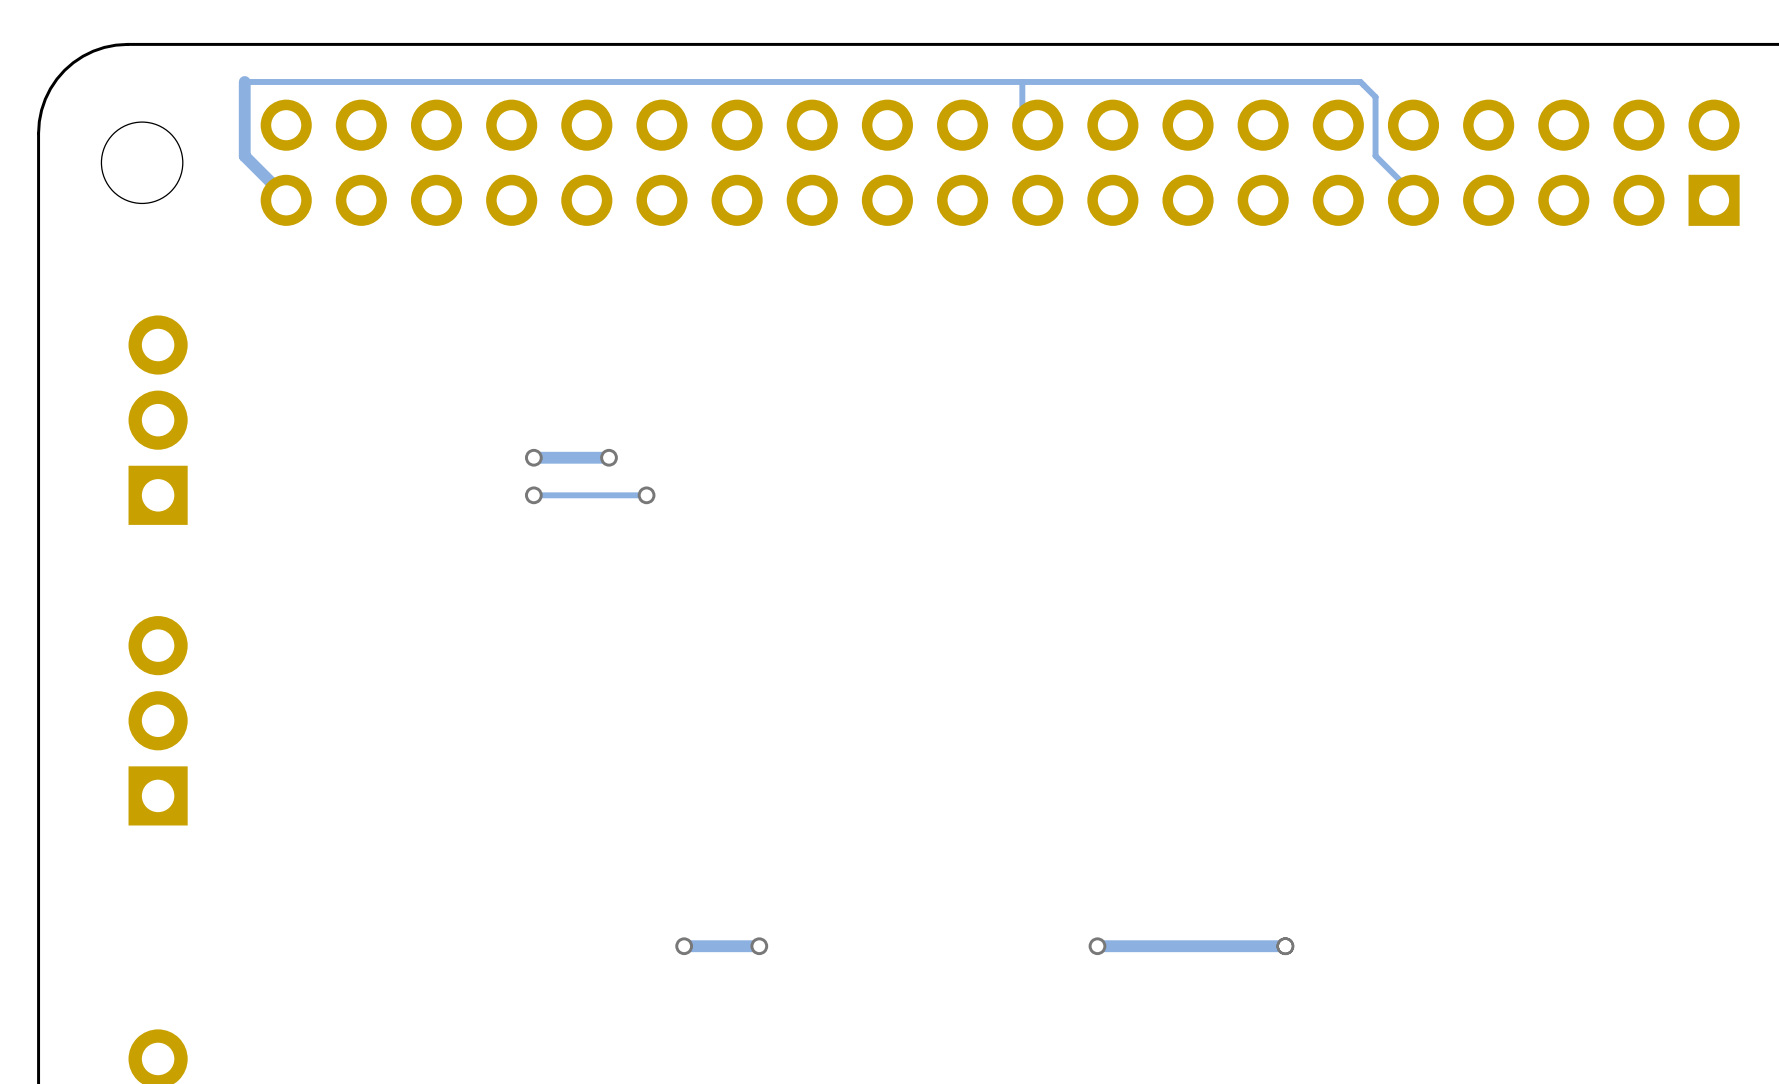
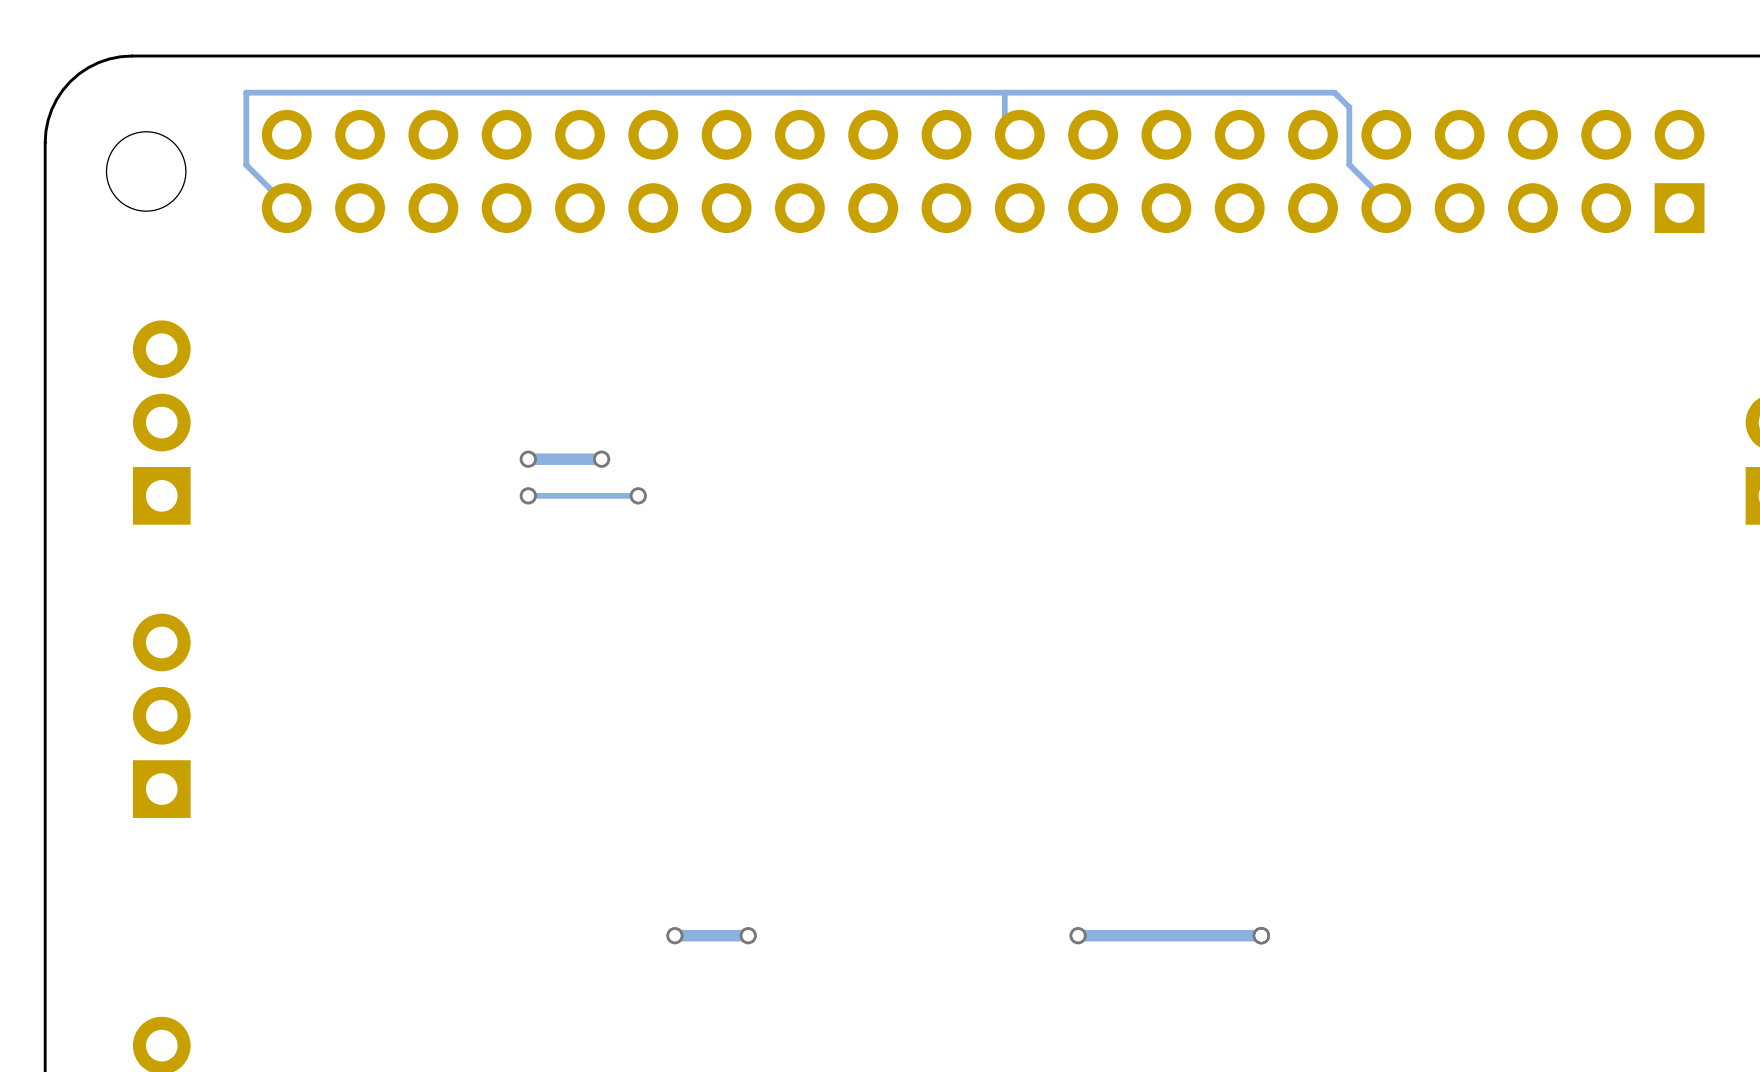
track width: thick (244, 81) (244, 156) (286, 197) -> thin (246, 92) (246, 165) (286, 205)

